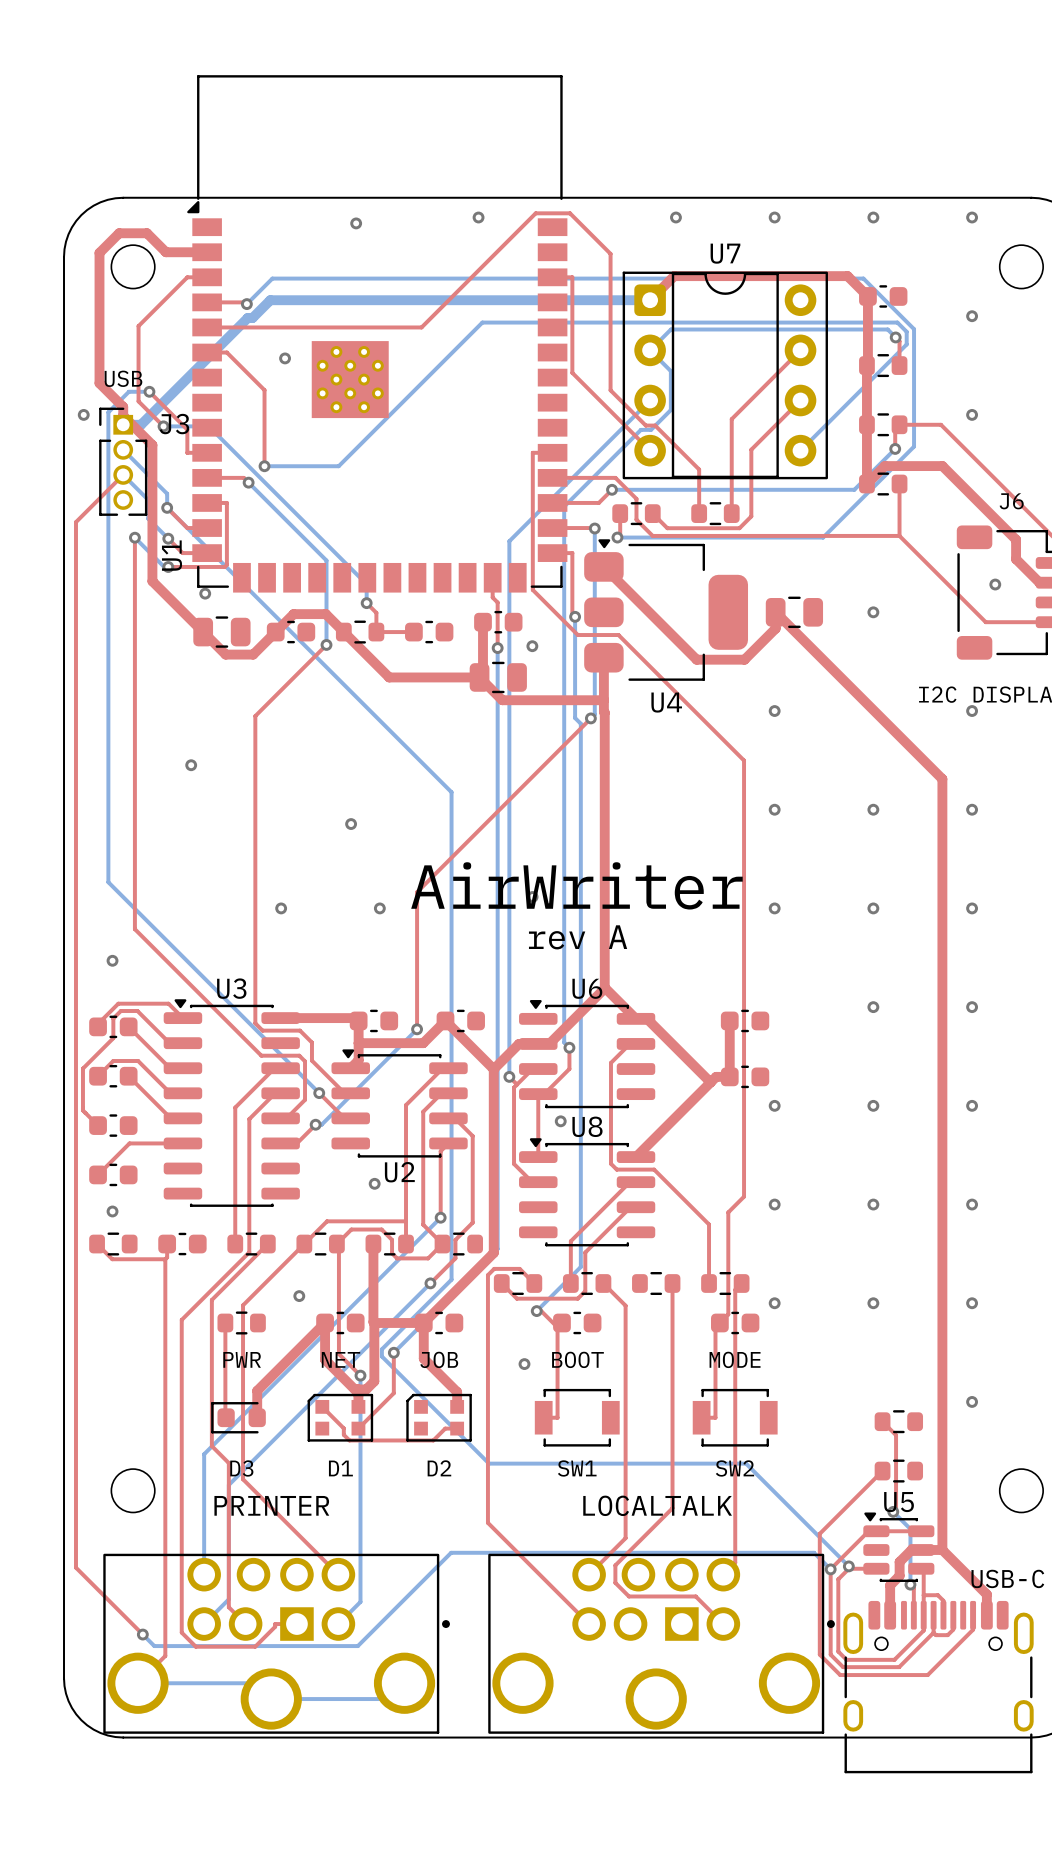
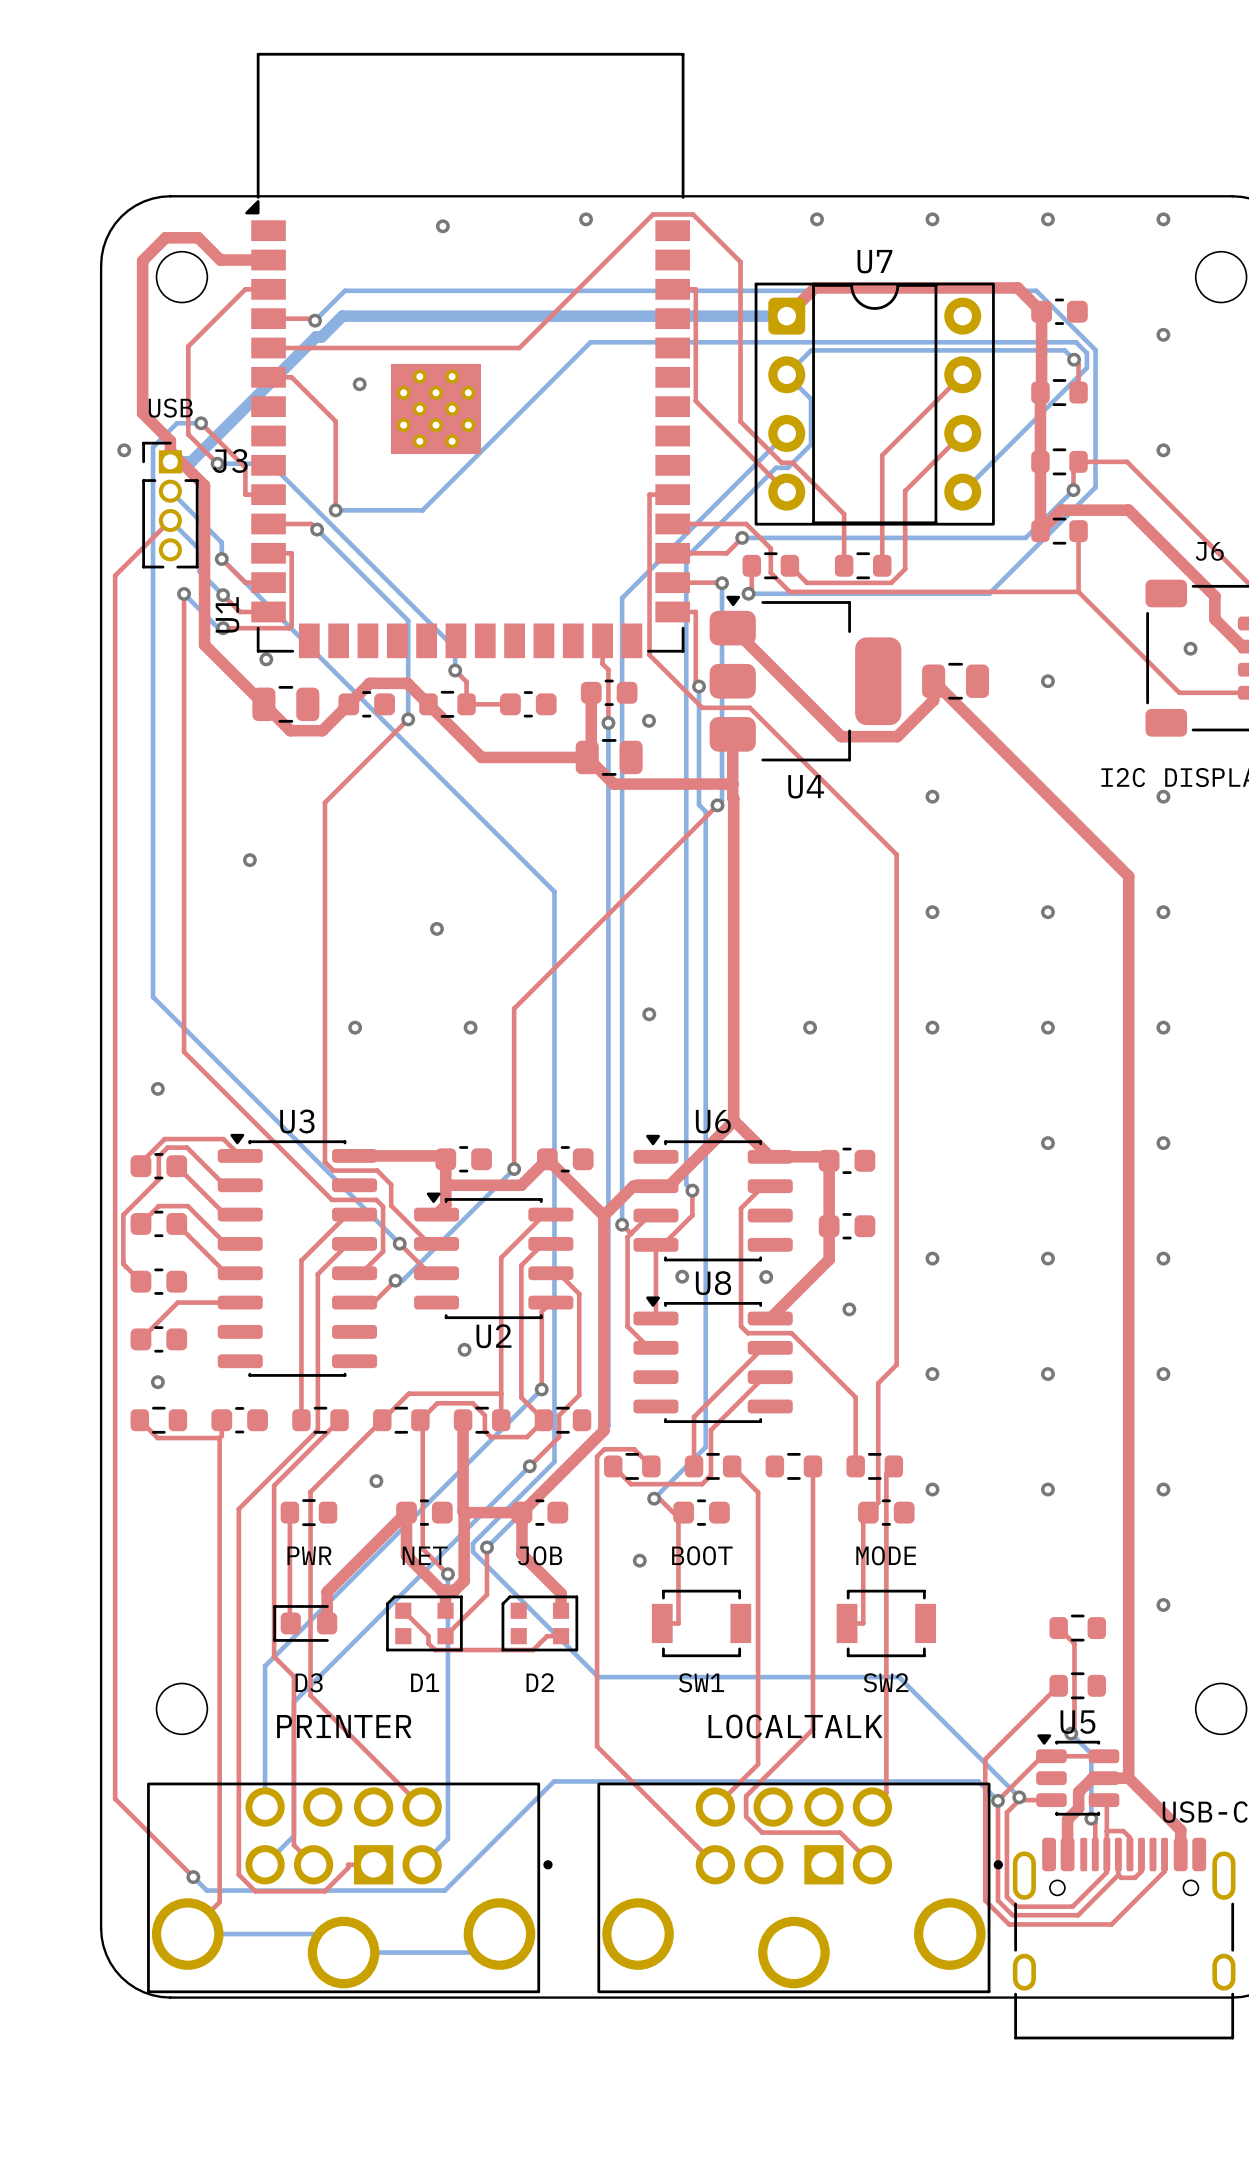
text: AirWriter (576, 885) -> none
via: none -> (810, 1027)
text: rev A (578, 937) -> none
top track: (647, 1018) (710, 1082) -> (783, 1156) (825, 1156) (829, 1160) (829, 1259)
top track: (729, 1020) (729, 1076) (716, 1076) (686, 1106) -> none
part: (745, 1020) -> none
part: none -> (847, 1160)
part: (745, 1076) -> none
part: none -> (847, 1226)
via: none -> (766, 1277)
via: none -> (849, 1309)

